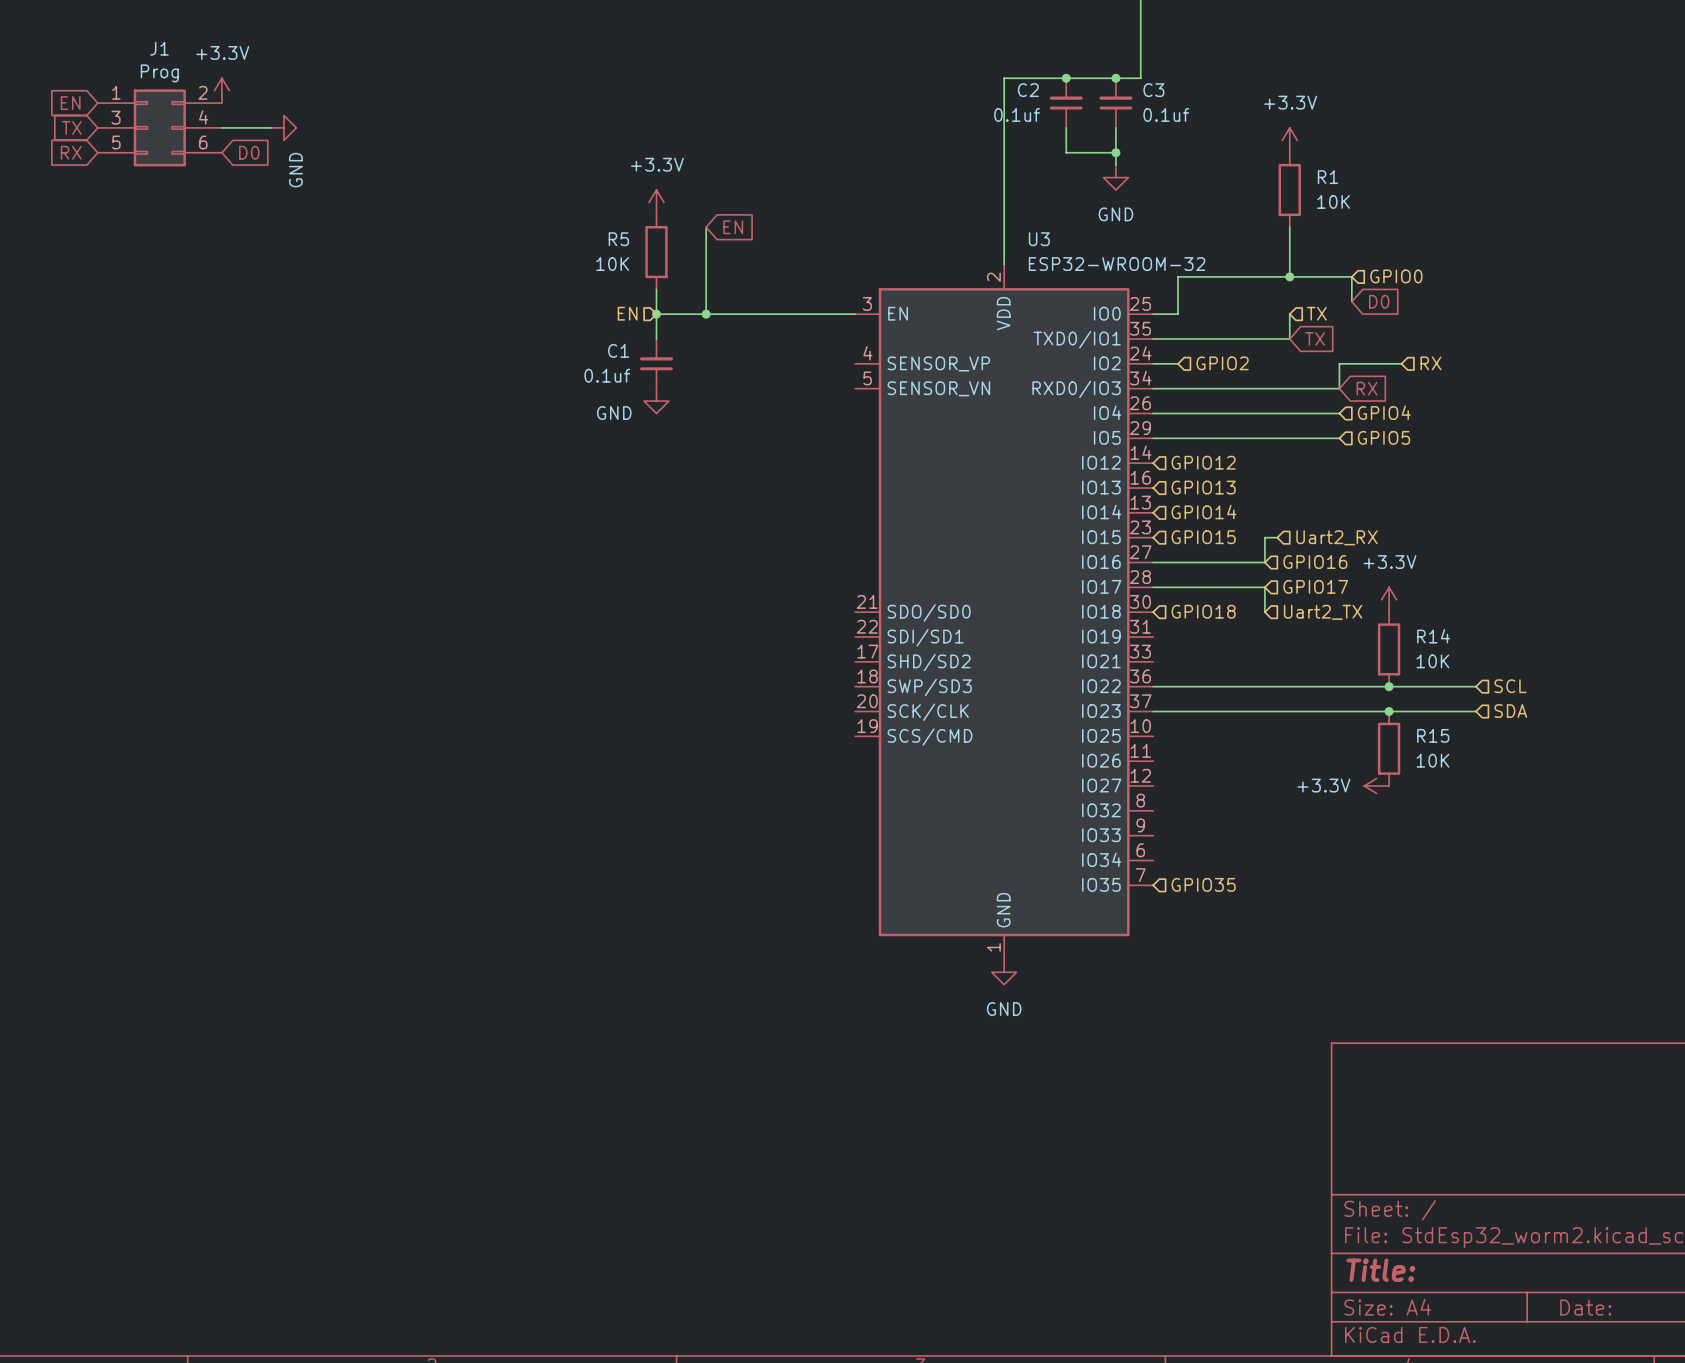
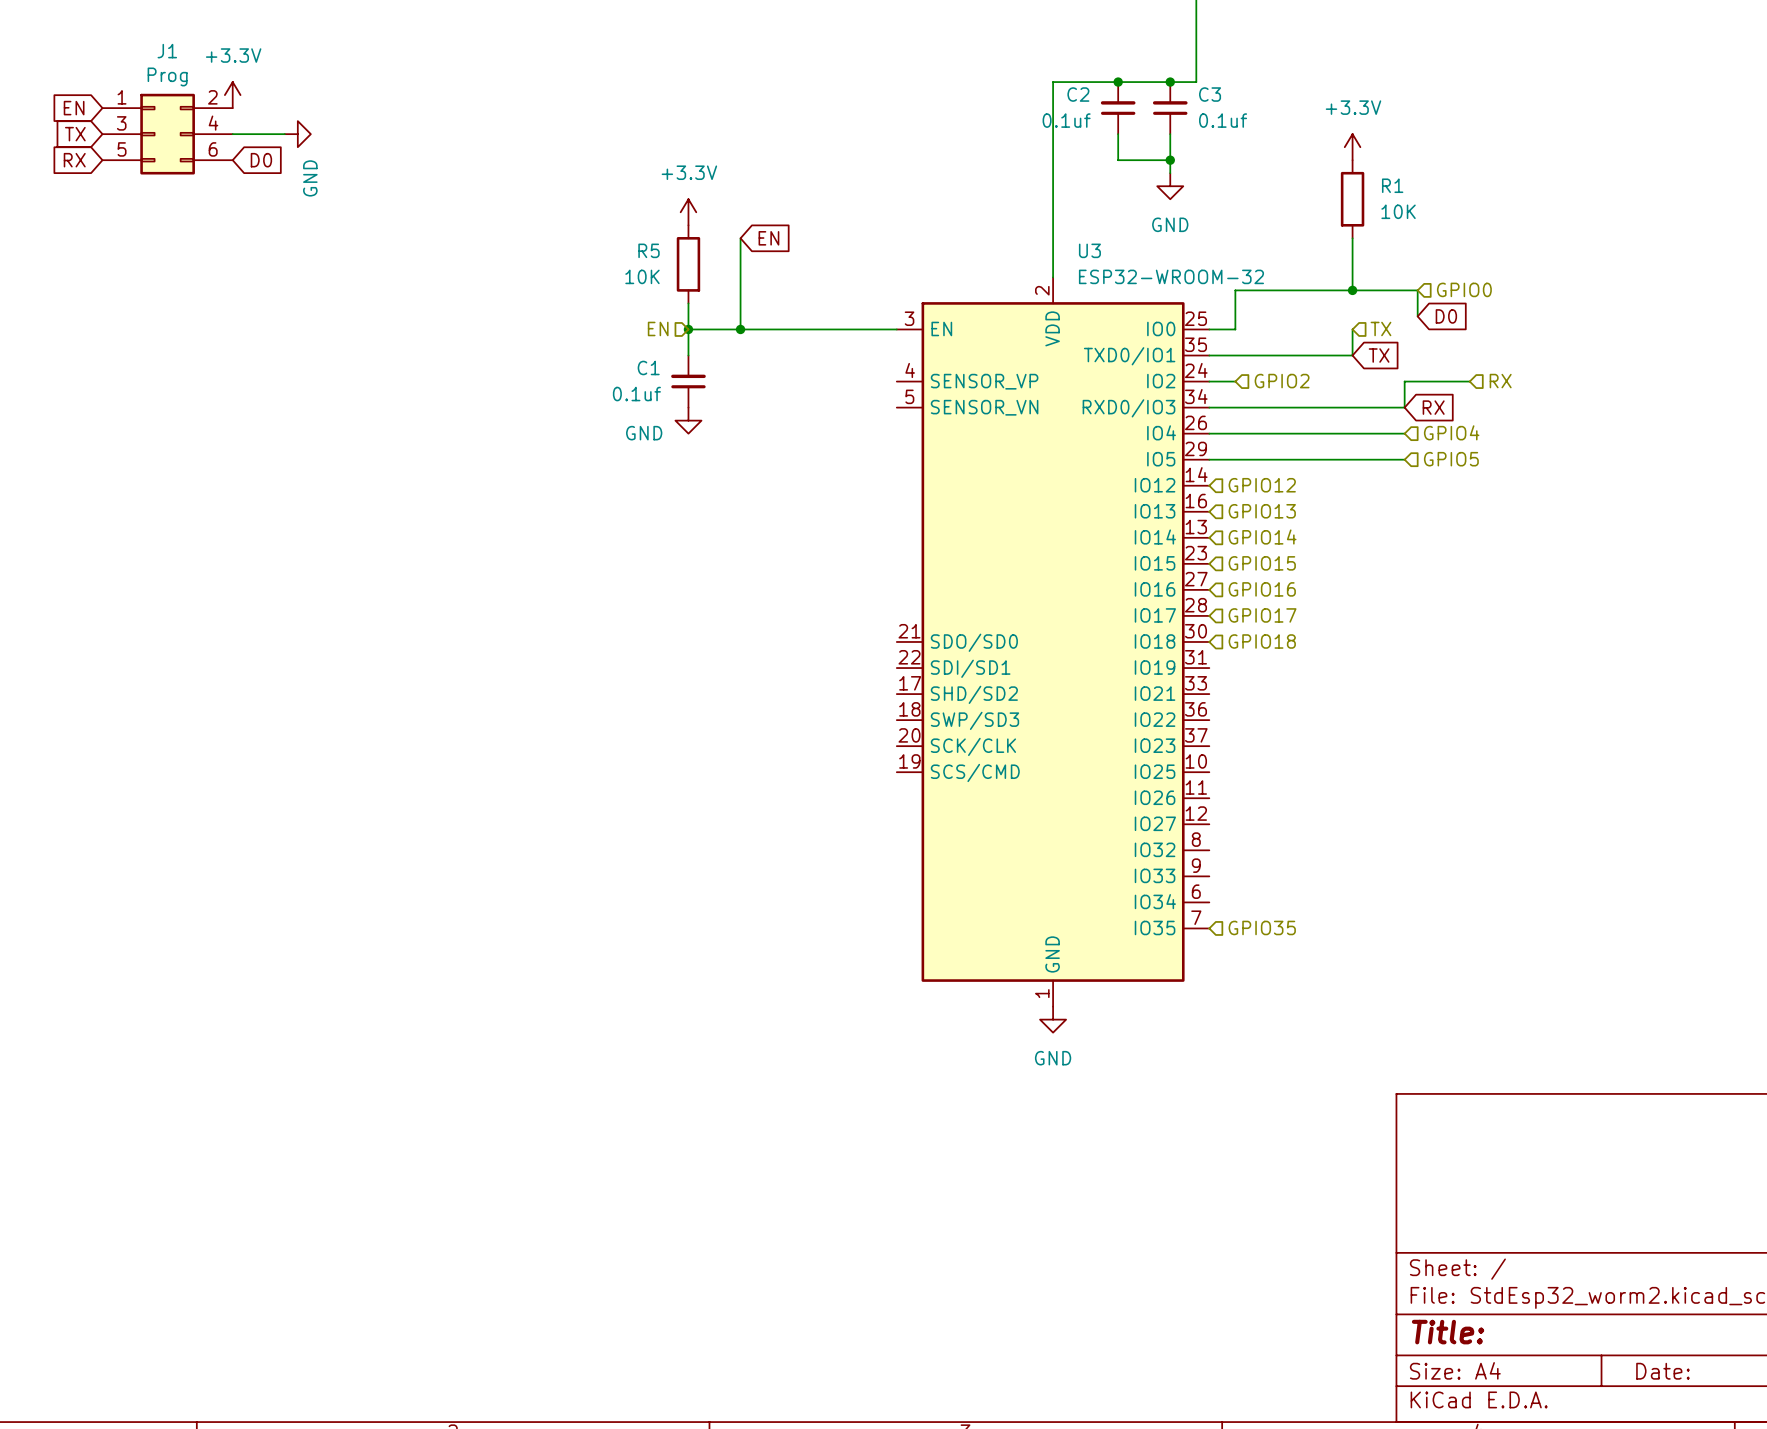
wire: (1277, 537) (1264, 537) (1264, 562) (1153, 562) -> none
hierarchical label: Uart2_RX (1336, 537) -> none
hierarchical label position: GPIO16 (1315, 562) -> GPIO16 (1262, 589)
hierarchical label position: GPIO17 (1315, 586) -> GPIO17 (1262, 615)
wire: (1153, 587) (1264, 587) (1264, 612) -> none
power symbol: +3.3V (1389, 599) -> none
hierarchical label: Uart2_TX (1323, 612) -> none
R14: 10K (1389, 649) -> none
wire: (1153, 686) (1476, 686) -> none
junction: (1389, 686) -> none
hierarchical label: SCL (1510, 686) -> none
wire: (1153, 711) (1476, 711) -> none
junction: (1389, 711) -> none
hierarchical label: SDA (1510, 711) -> none
R15: 10K (1389, 748) -> none
power symbol: +3.3V (1376, 786) -> none

